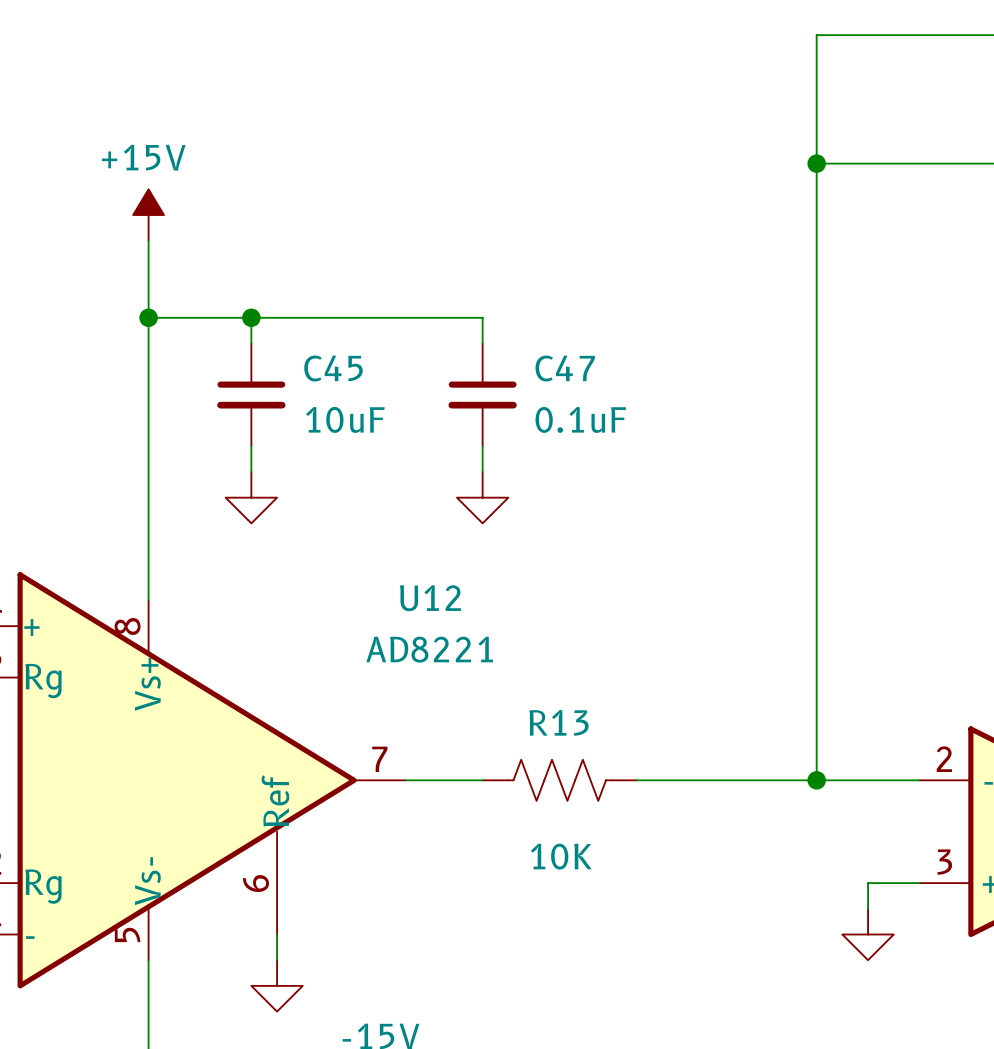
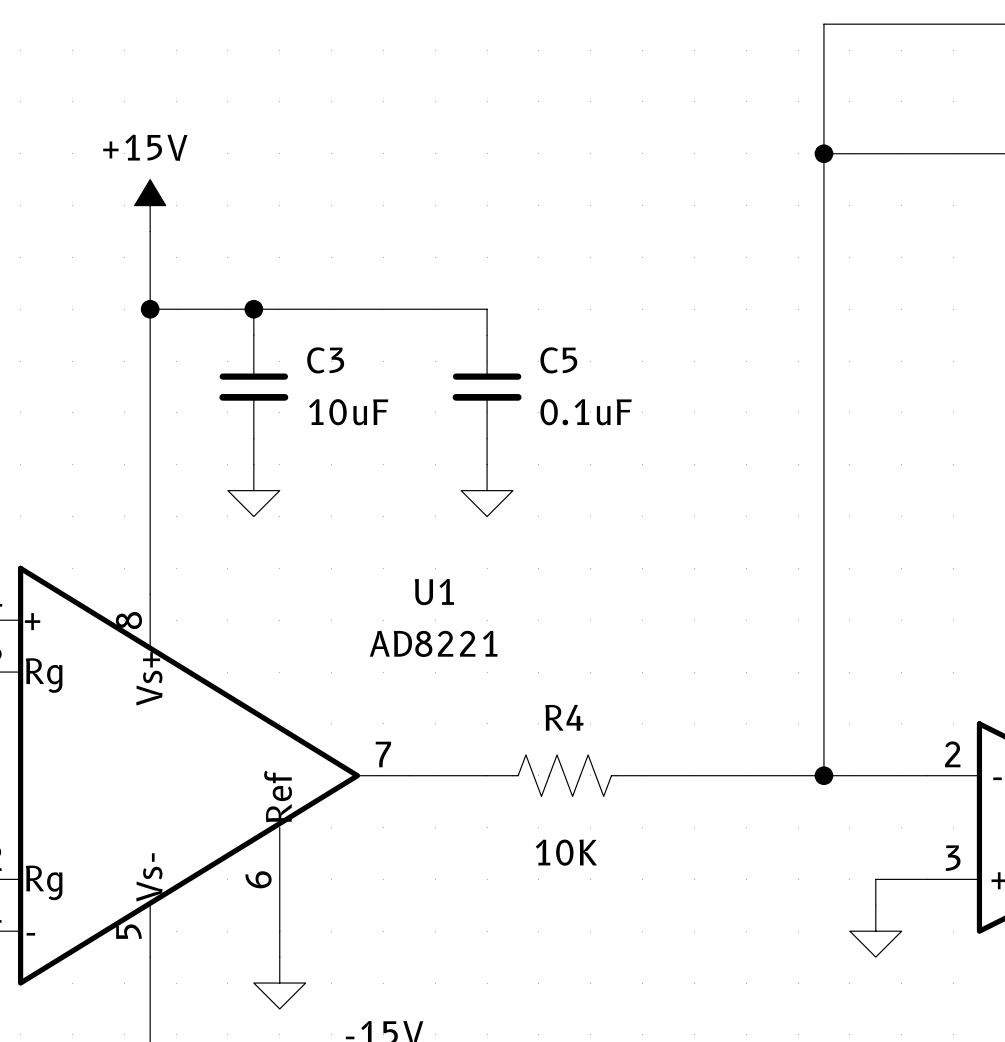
C45 name: C45 (333, 368) -> C3 (325, 360)
C47 name: C47 (565, 368) -> C5 (558, 360)
U12 name: U12 (430, 598) -> U1 (434, 592)
R13 name: R13 (558, 722) -> R4 (564, 717)

